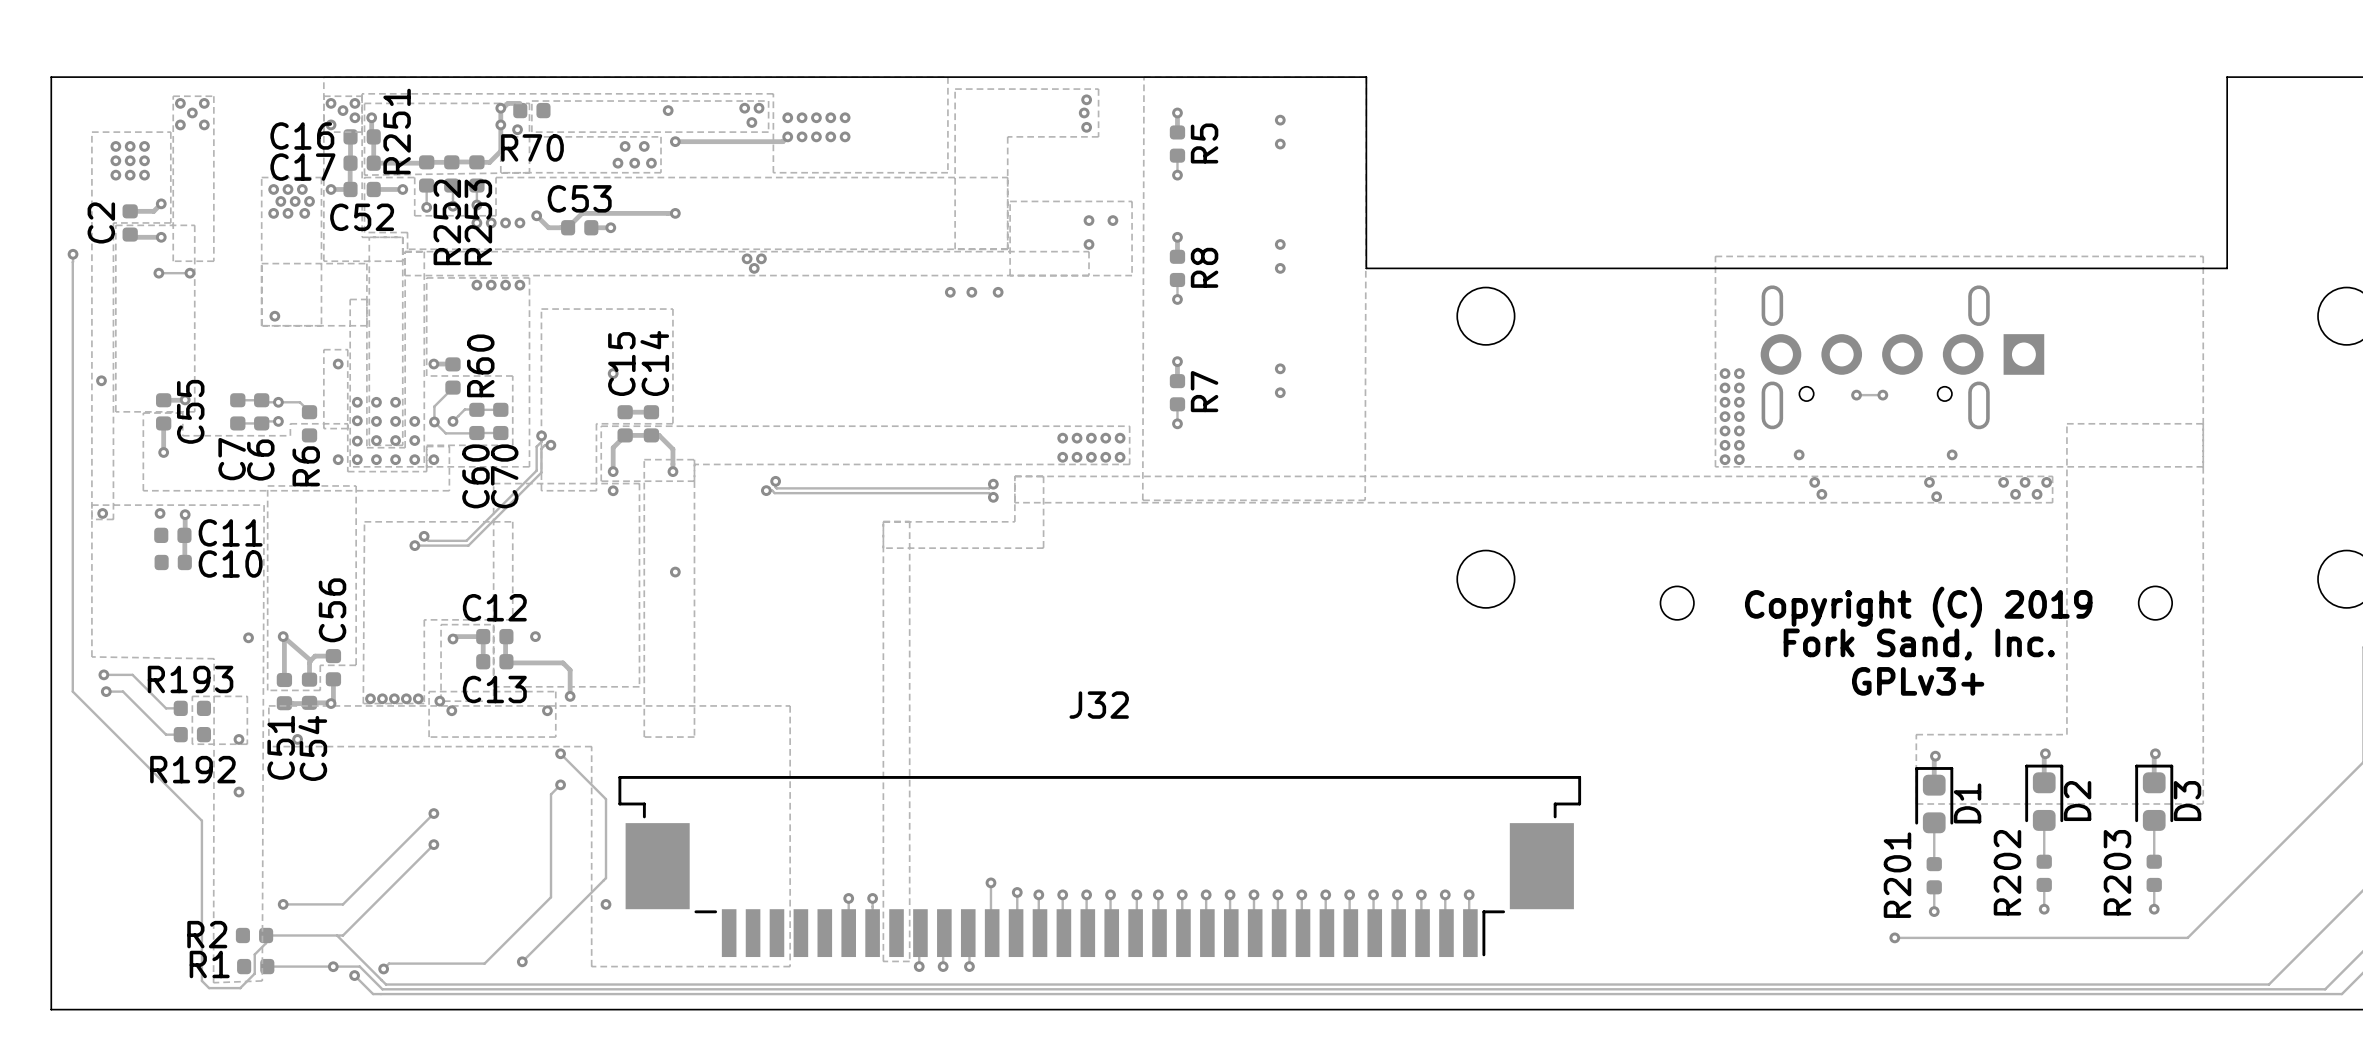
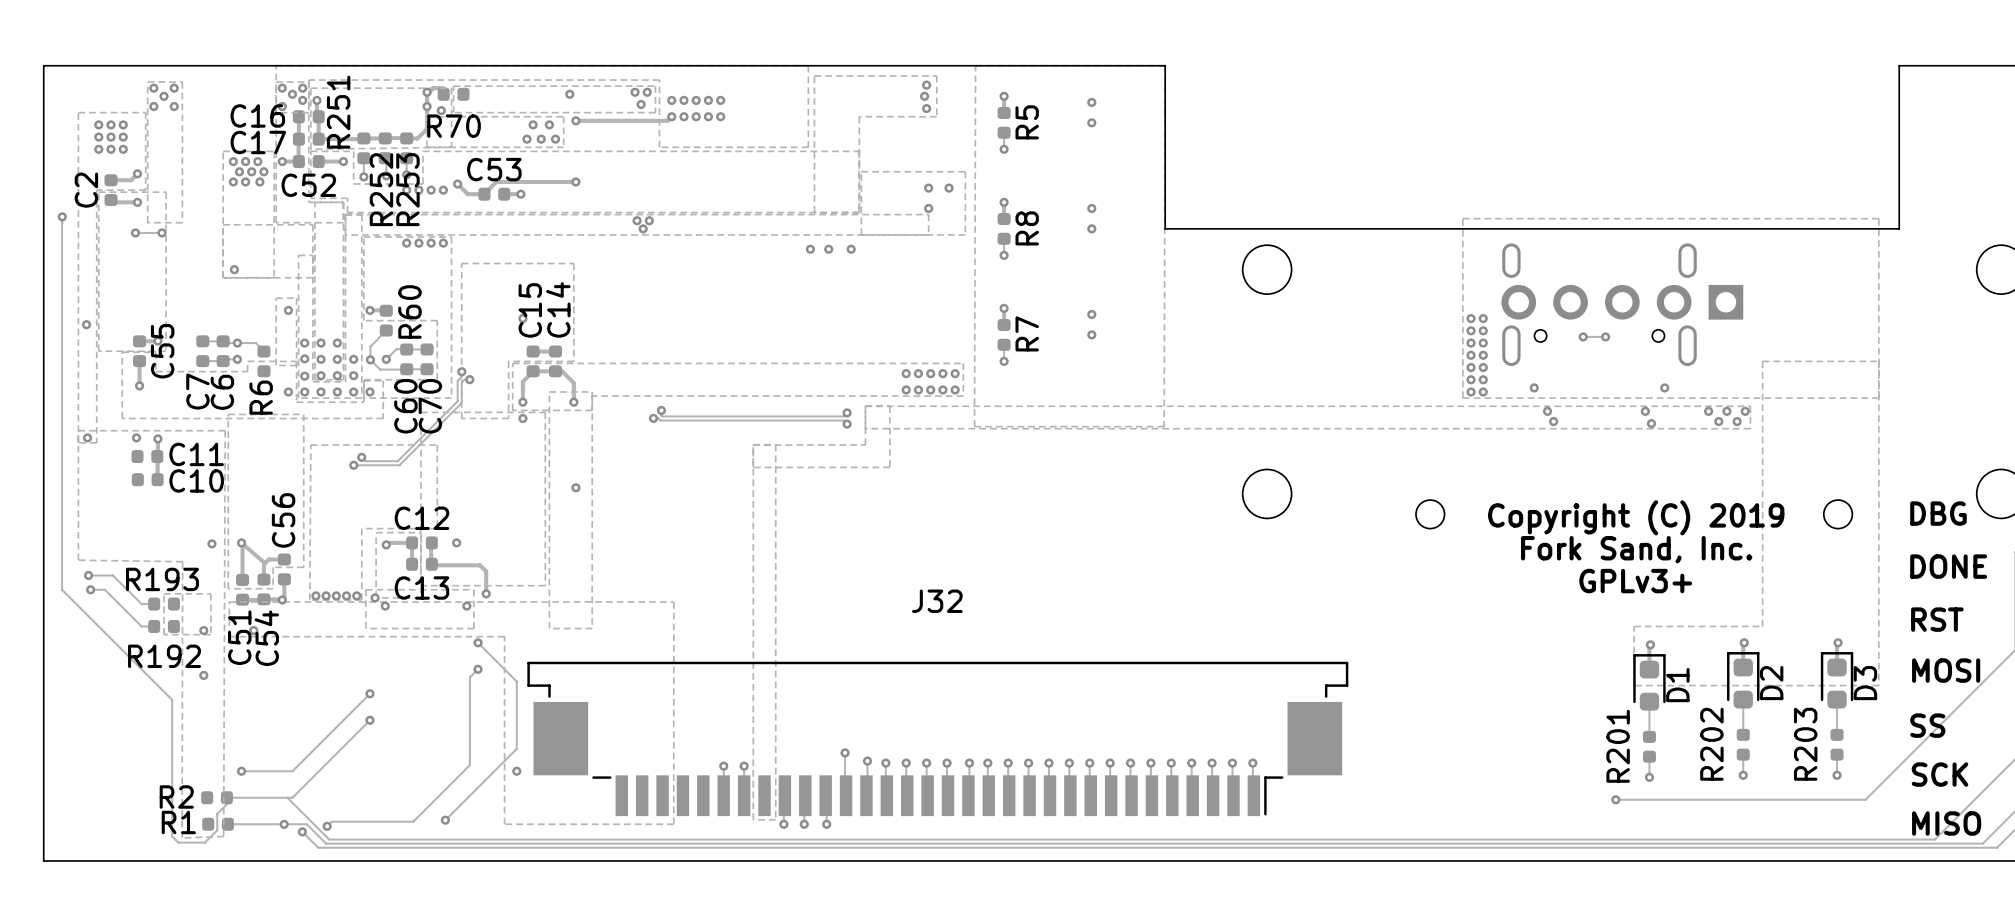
text: none -> DBG (1938, 513)
text: none -> DONE (1948, 566)
text: none -> RST (1937, 619)
text: none -> MOSI (1946, 670)
text: none -> SS (1927, 725)
text: none -> SCK (1940, 774)
text: none -> MISO (1946, 823)

